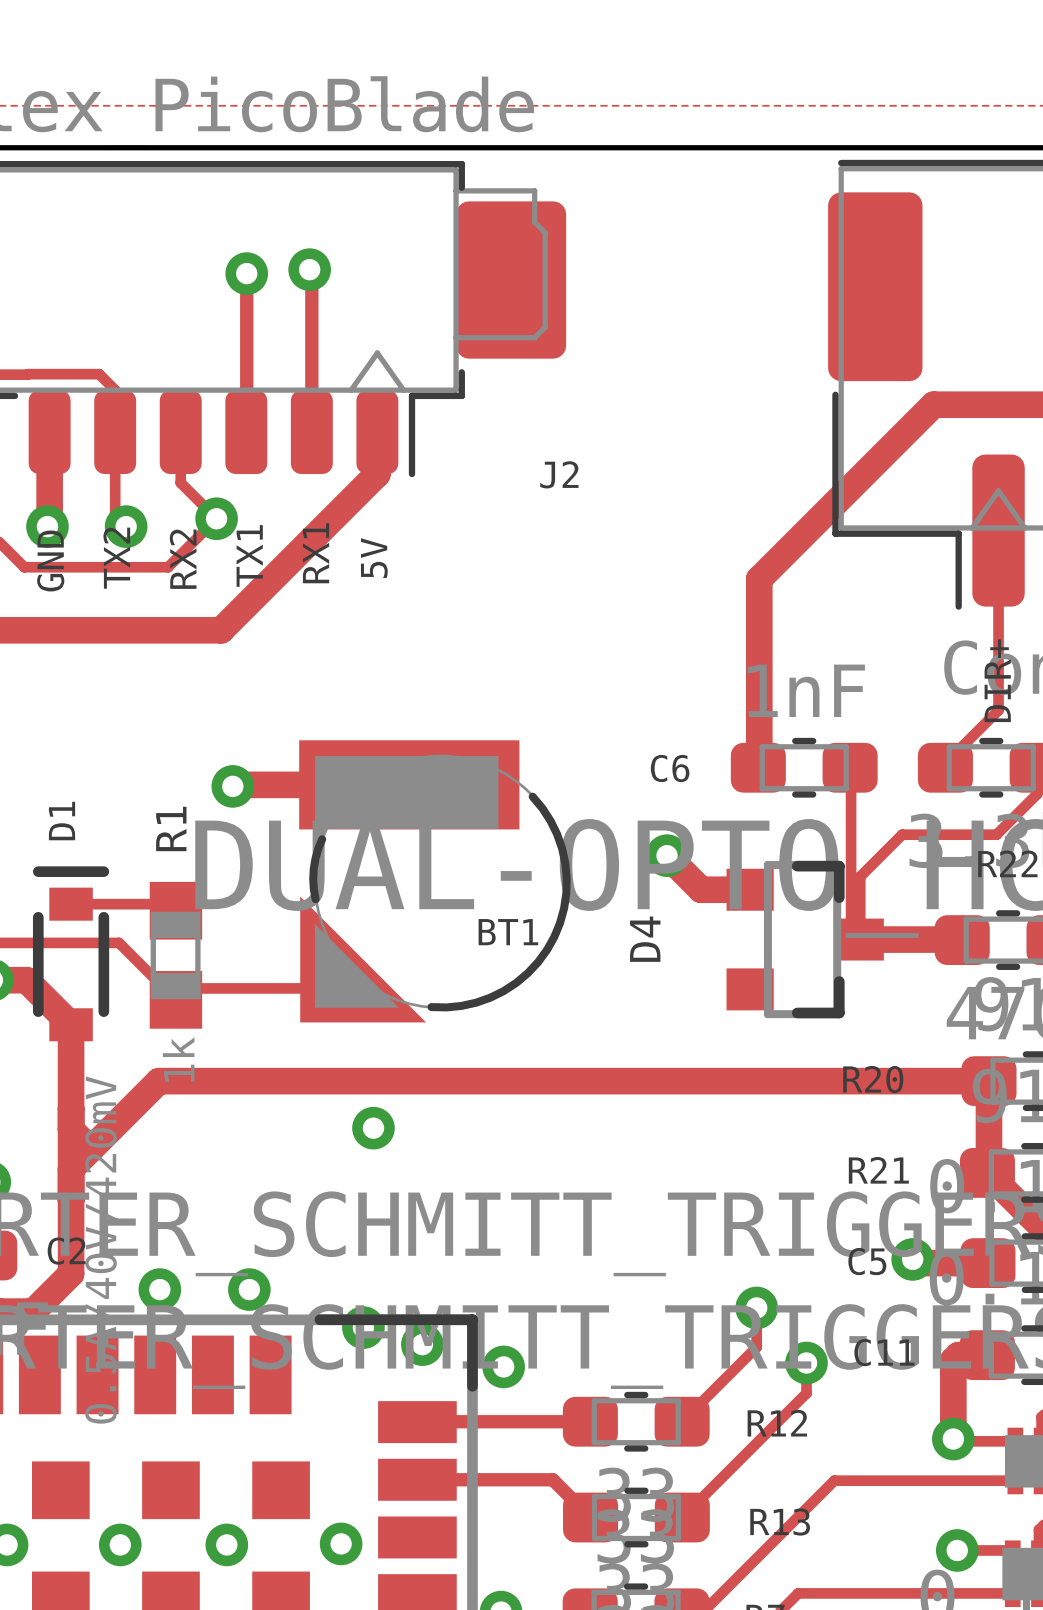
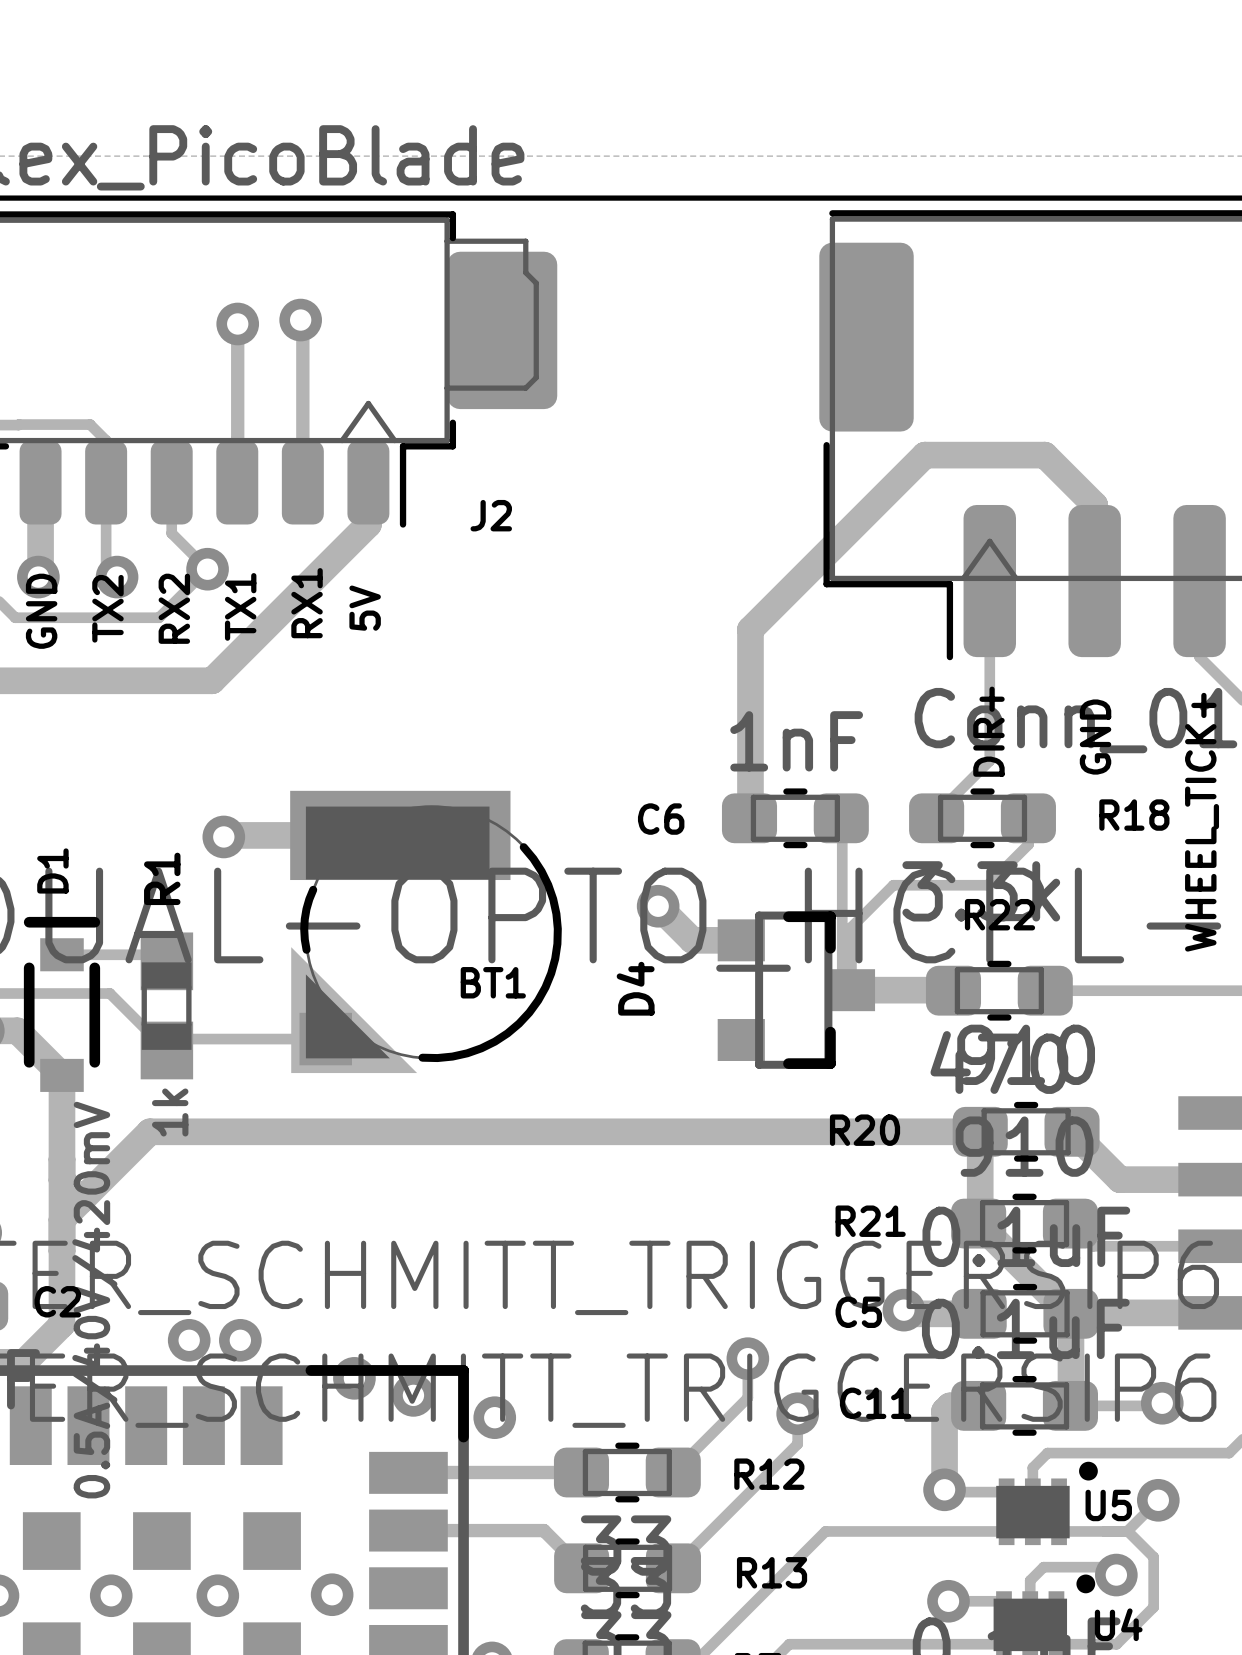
J2 name position: J2 (559, 474) -> J2 (491, 515)
via: (373, 1128) -> none
via position: (159, 1289) -> (189, 1340)

